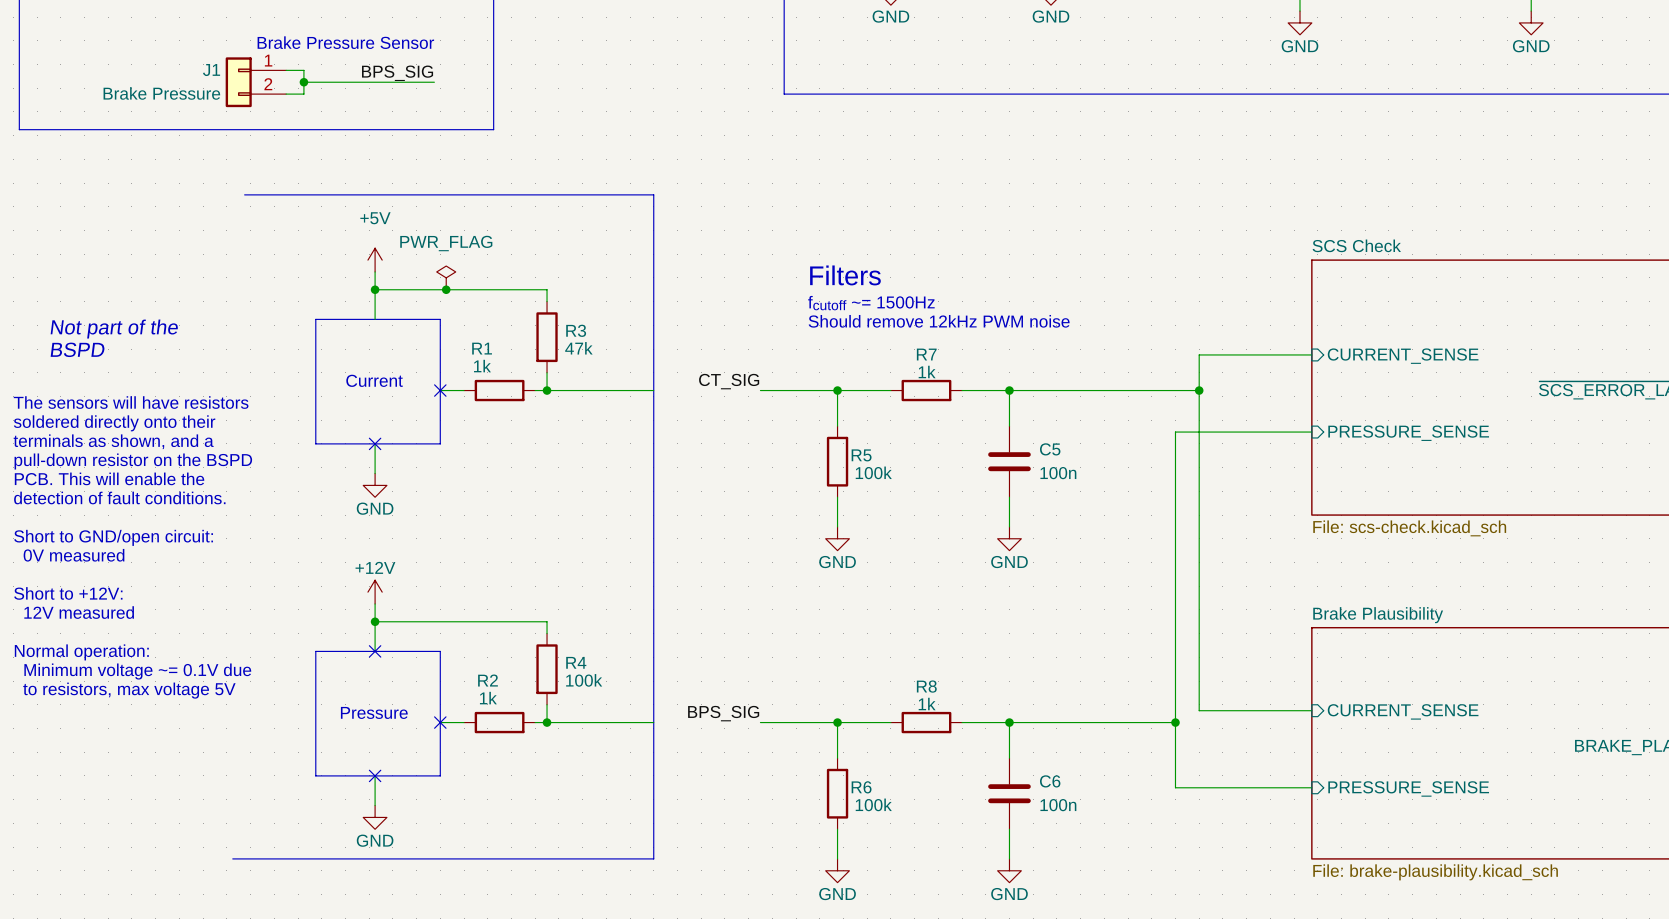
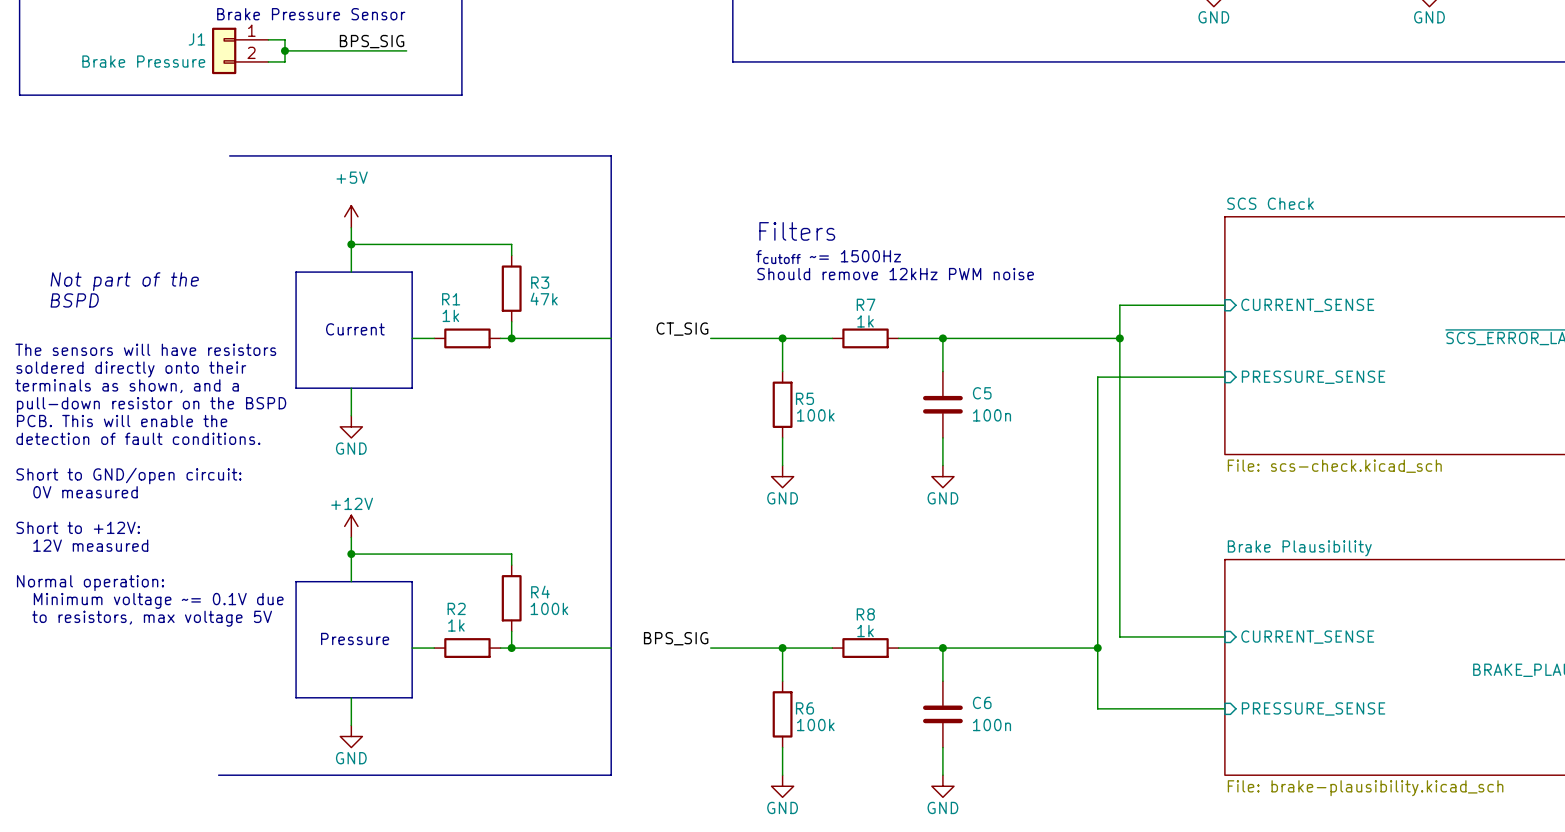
power symbol: PWR_FLAG (446, 277) -> none
junction: (446, 289) -> none
no-connect mark: (440, 390) -> none
no-connect mark: (375, 443) -> none
no-connect mark: (375, 651) -> none
no-connect mark: (440, 722) -> none
no-connect mark: (375, 775) -> none

